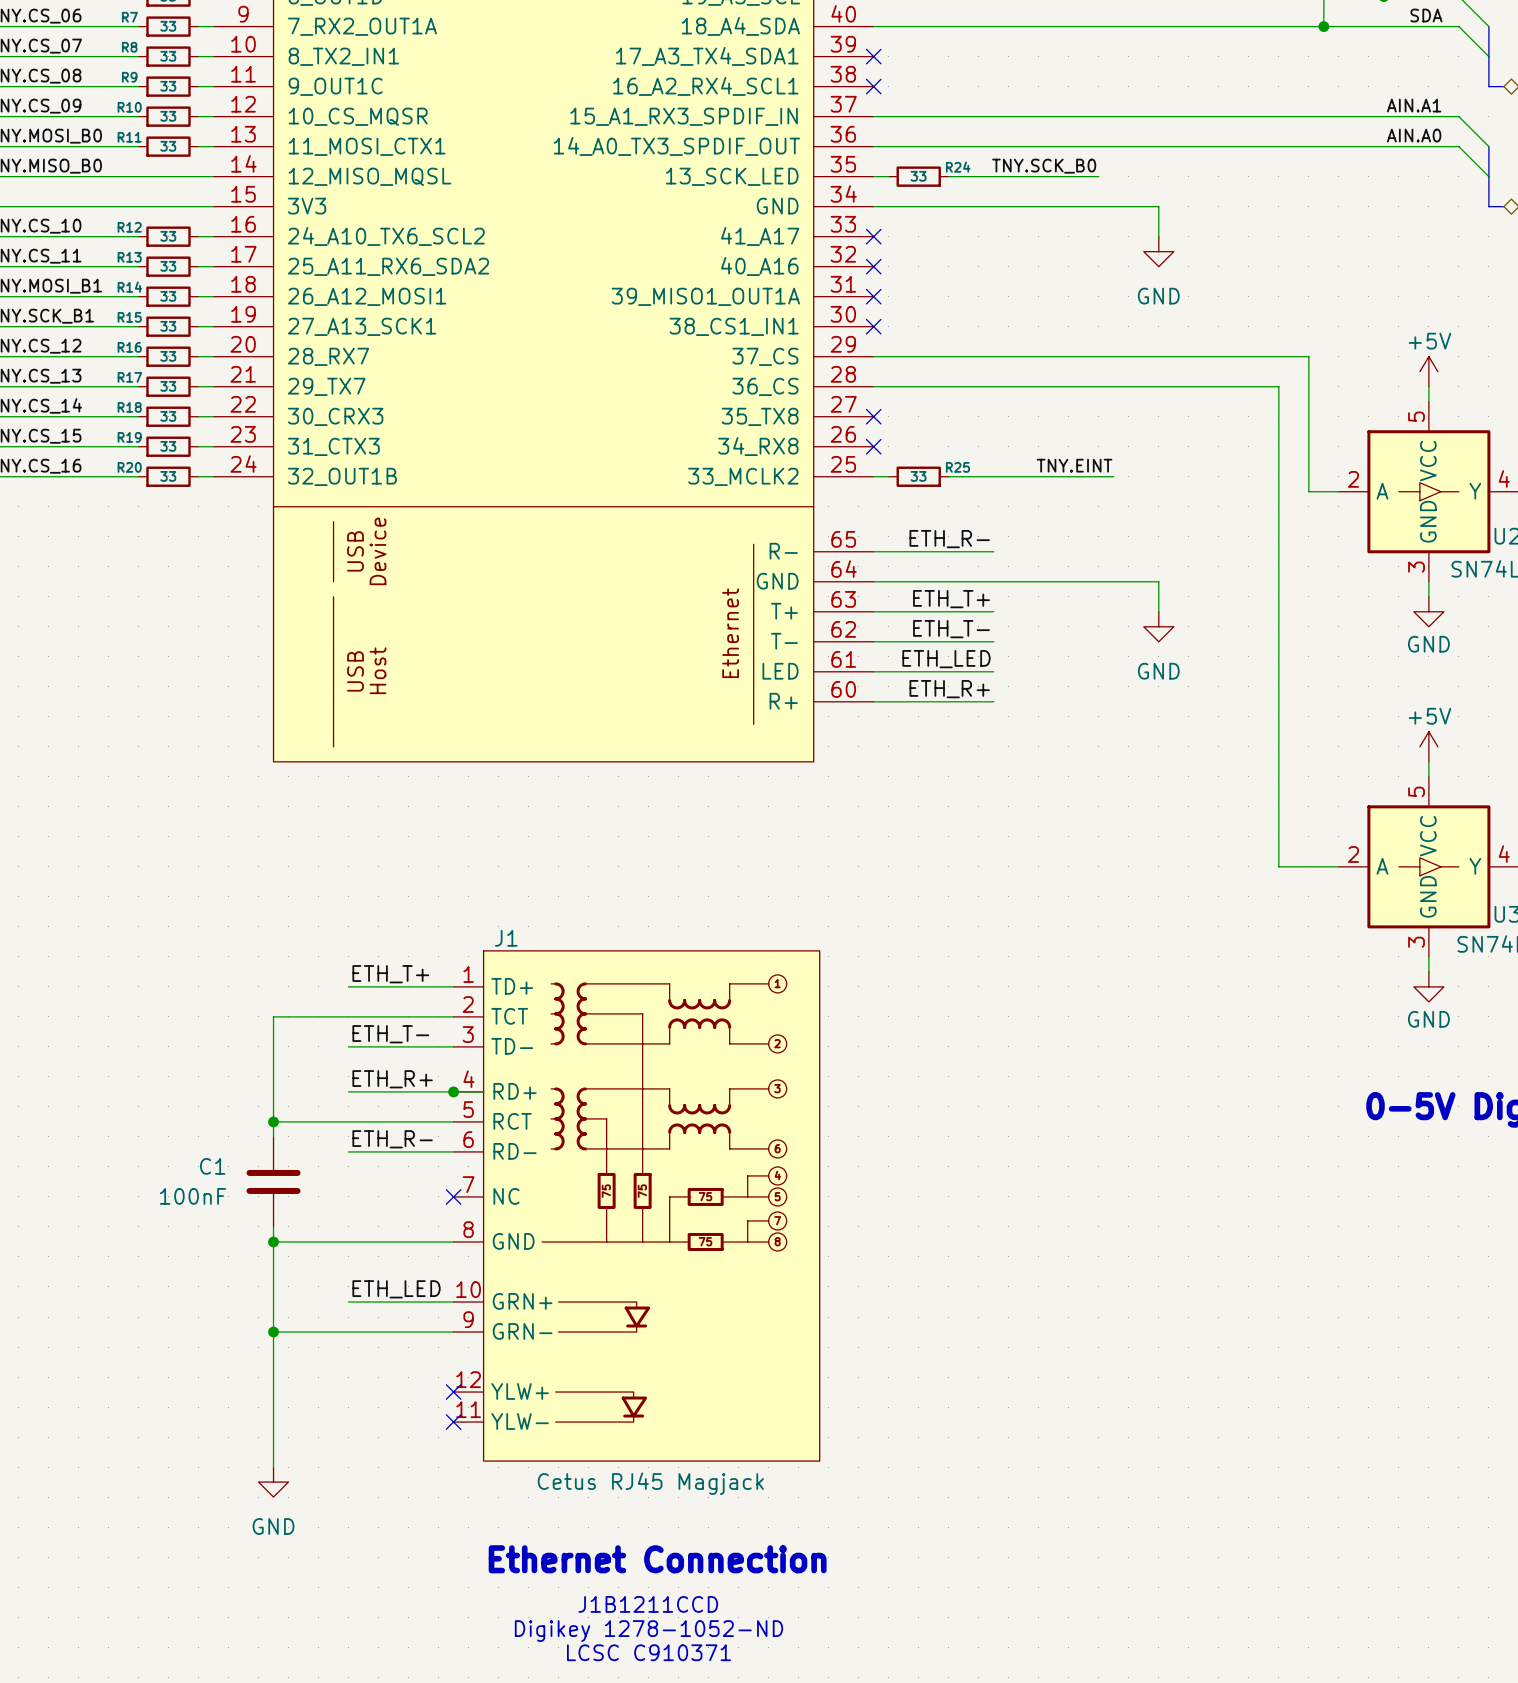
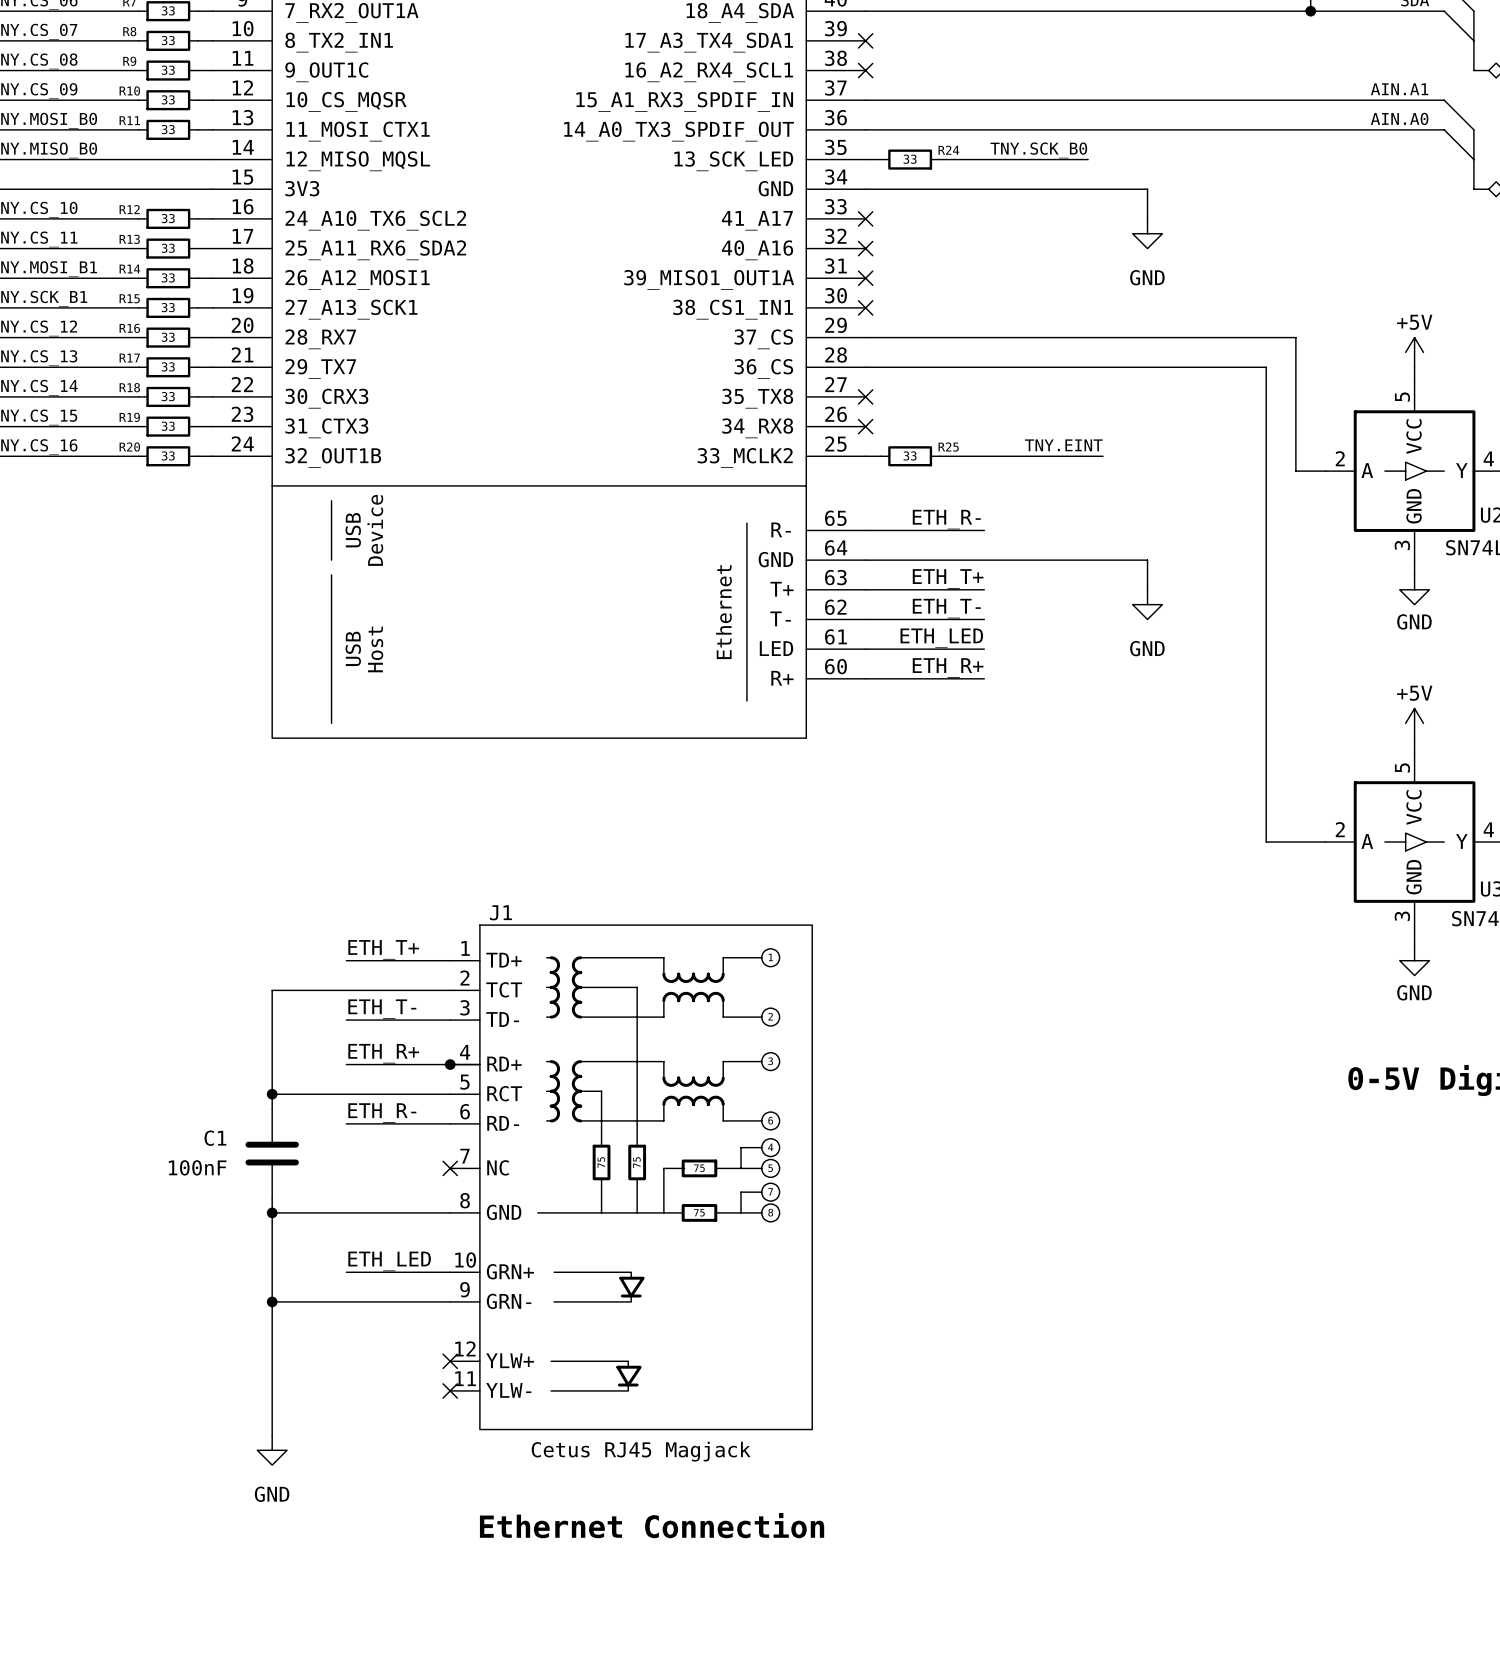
text: J1B1211CCD (648, 1604) -> none
text: Digikey 1278-1052-ND (649, 1631) -> none
text: LCSC C910371 (649, 1652) -> none

